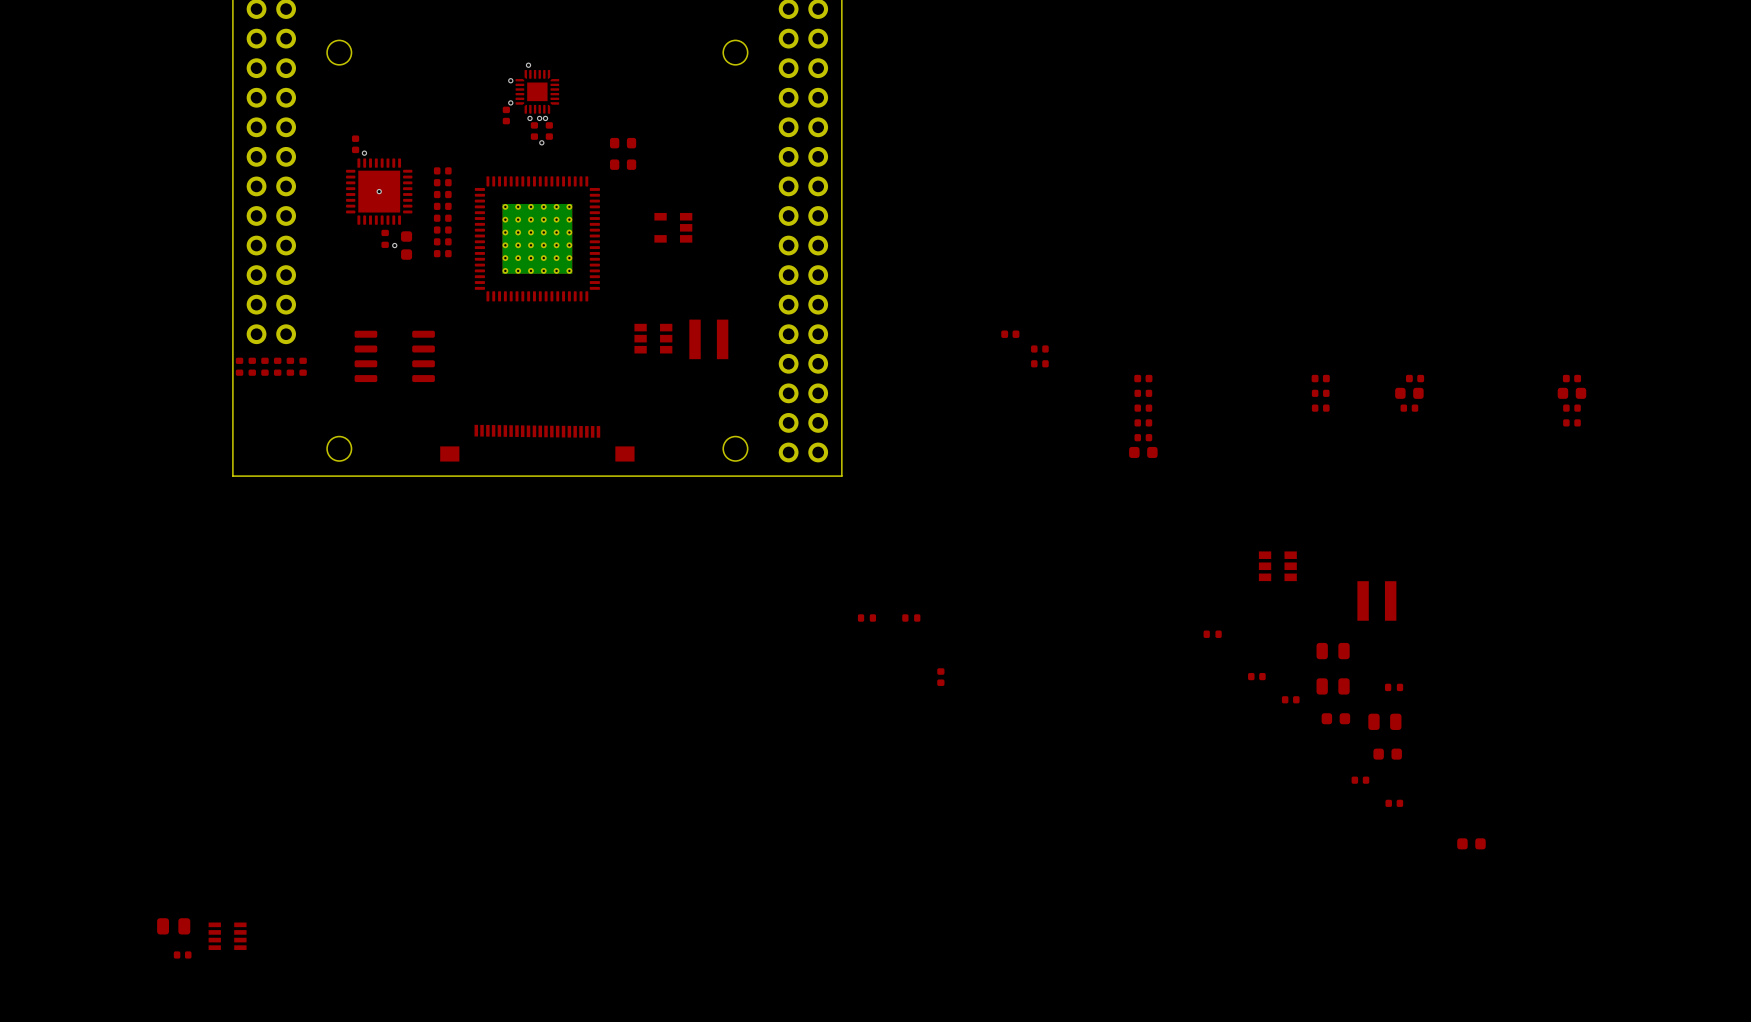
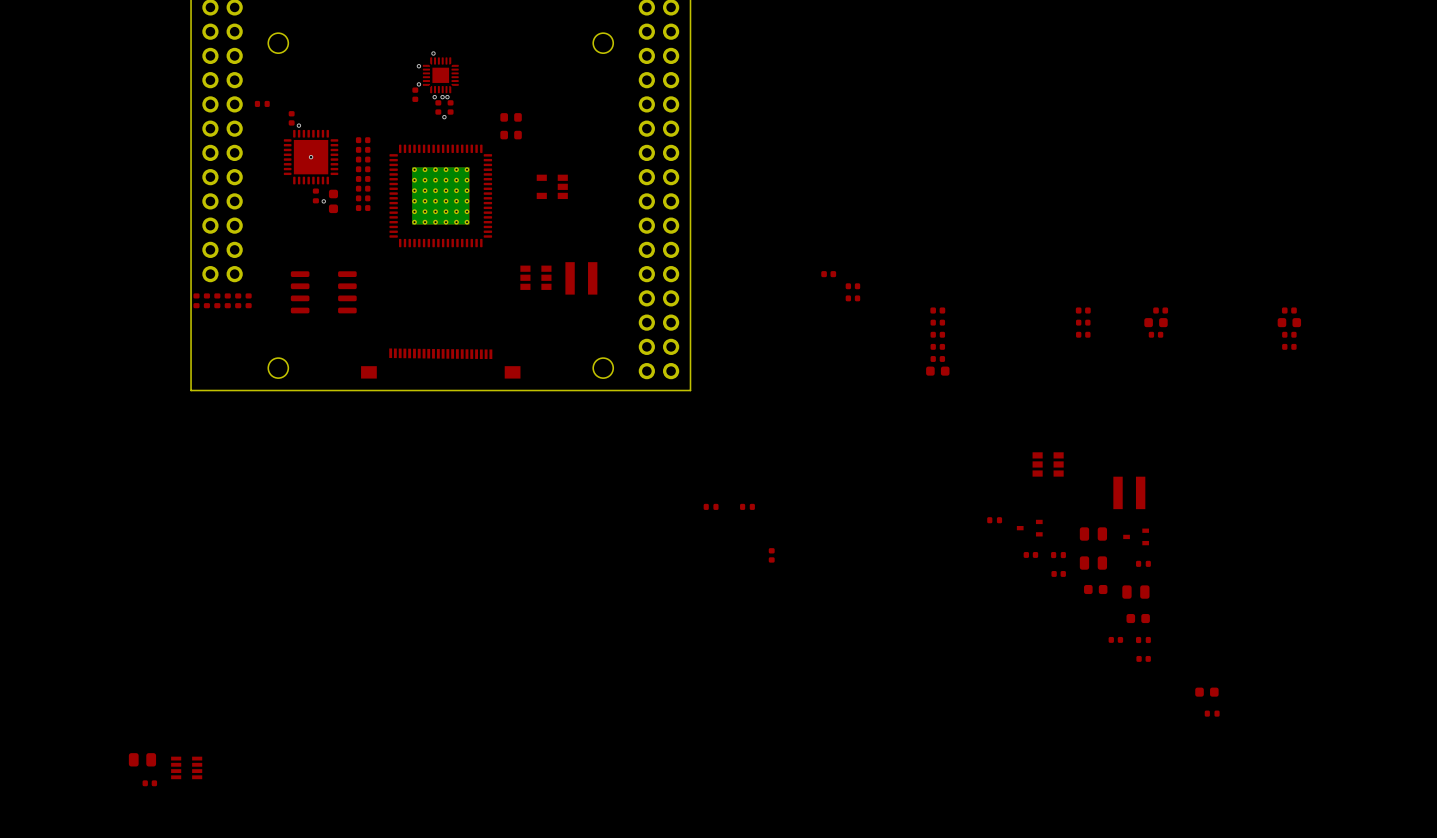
part: none -> (262, 103)
part: none -> (1029, 528)
part: none -> (1136, 536)
part: none -> (1058, 555)
part: none -> (1143, 640)
part: none -> (1212, 713)

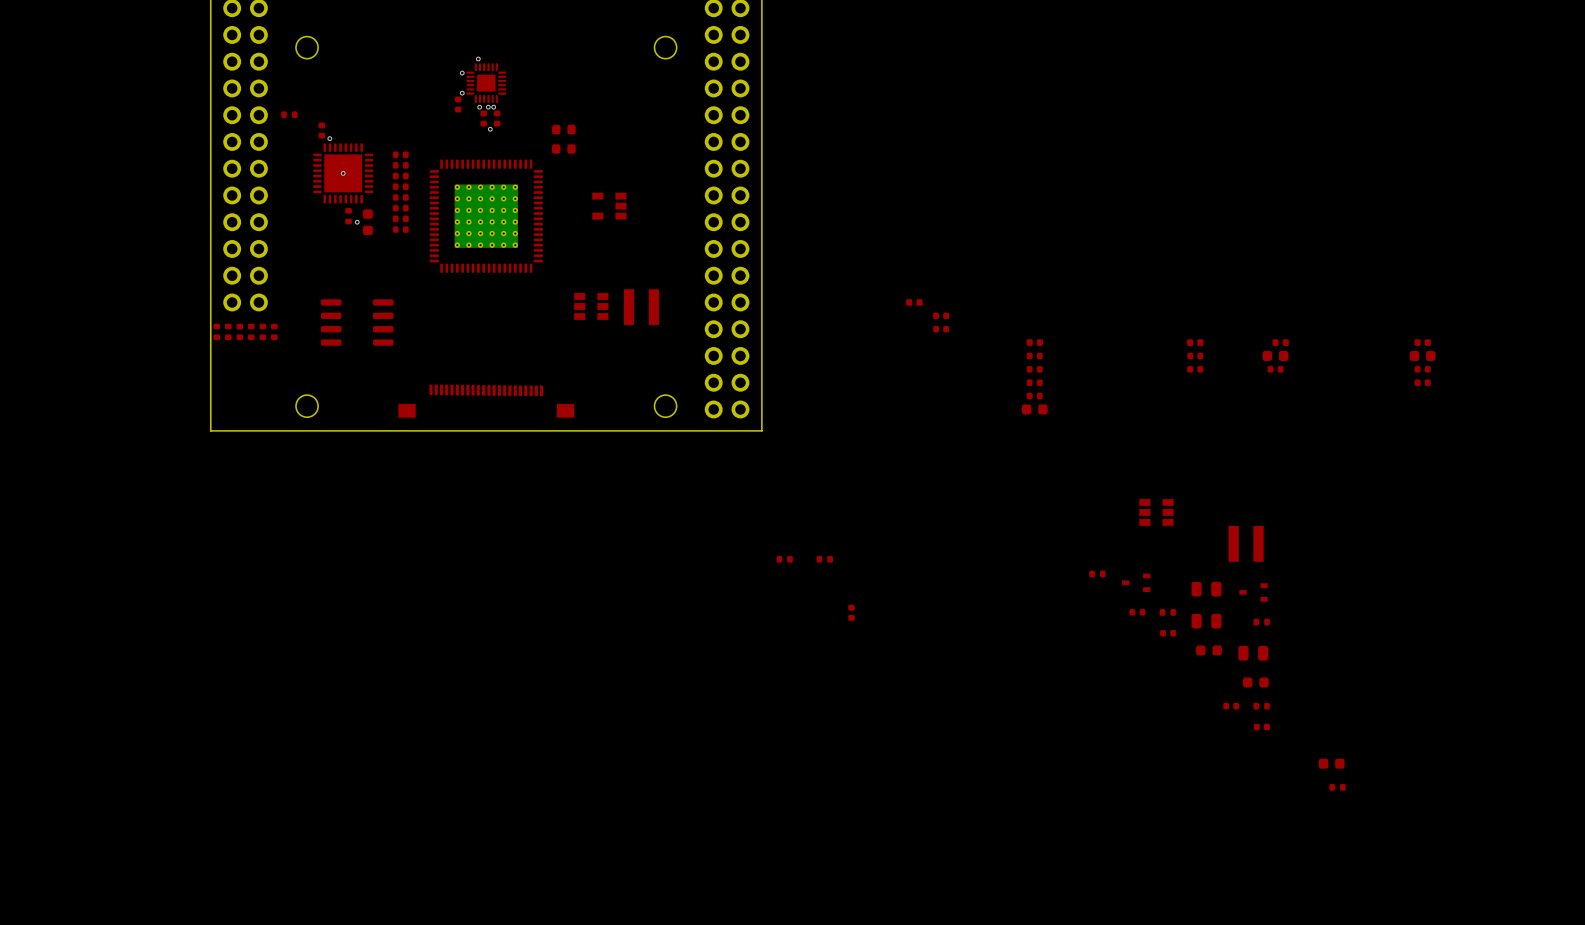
part: (142, 759) -> none
part: (186, 767) -> none
part: (149, 783) -> none

